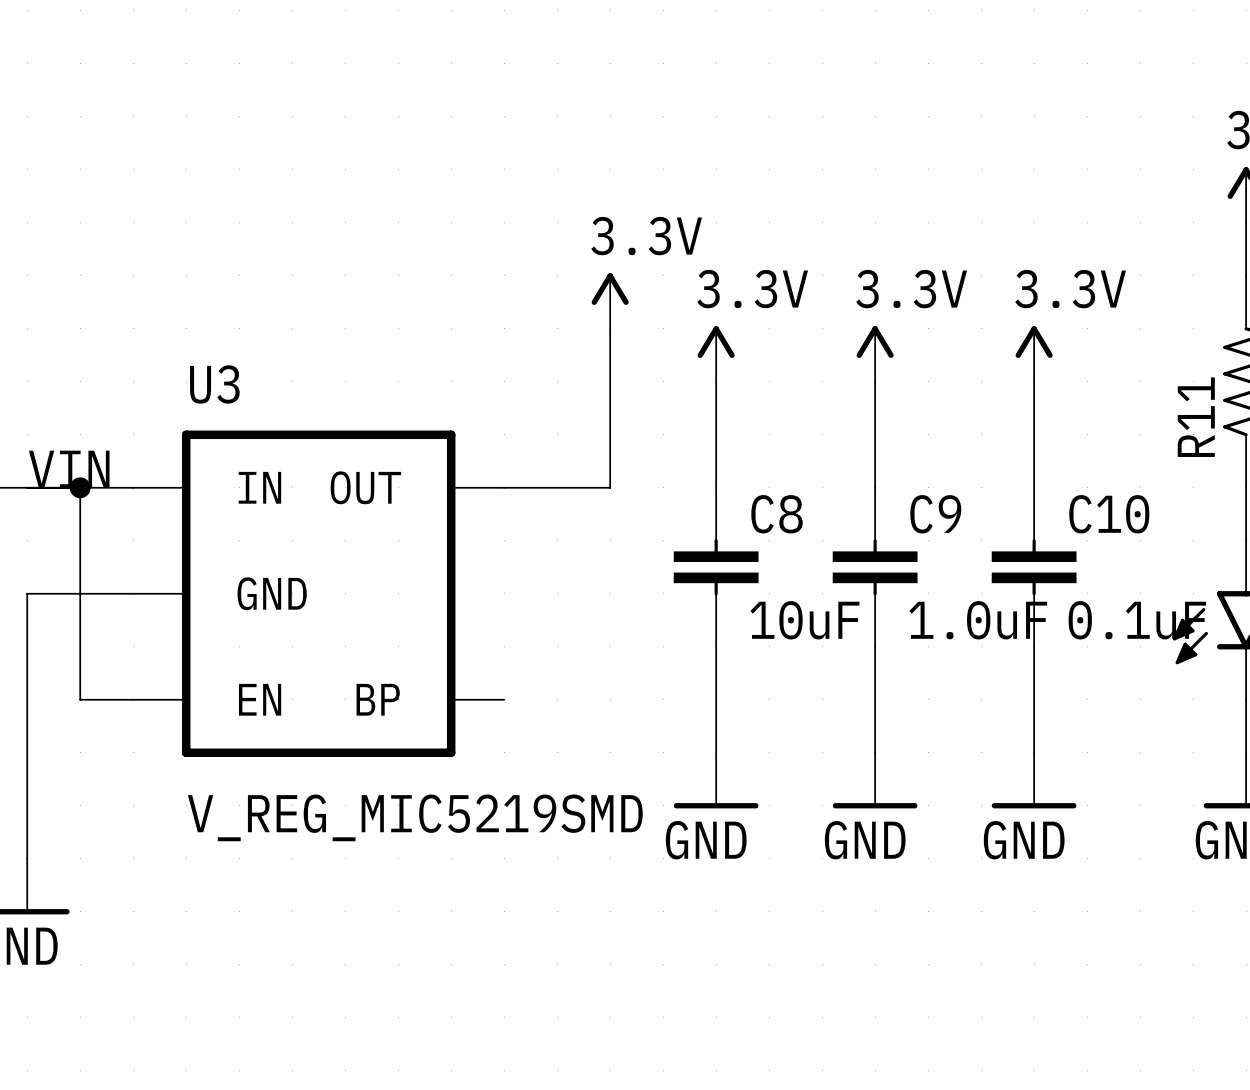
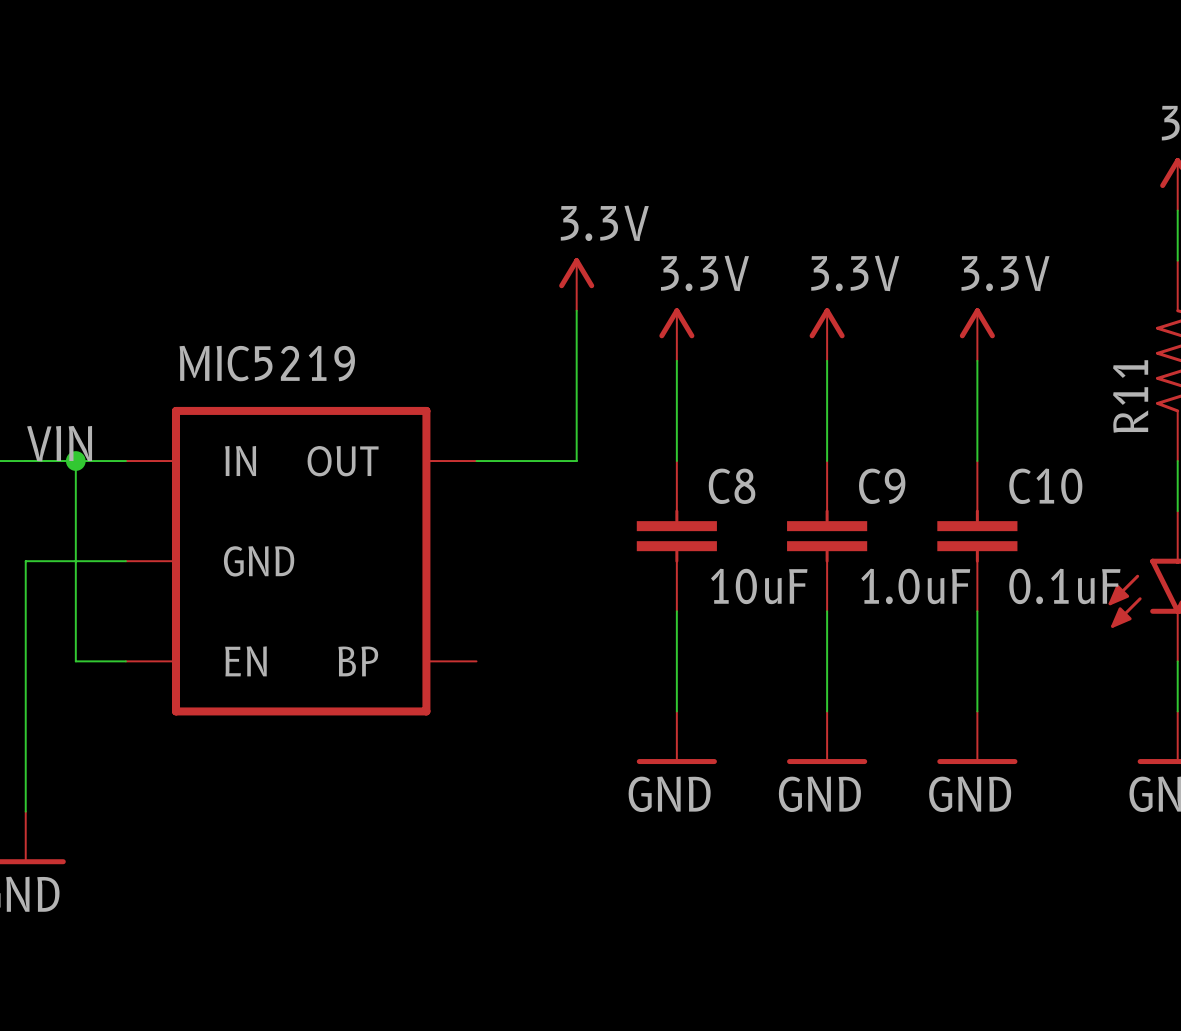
U3 name: U3 (214, 384) -> MIC5219 (267, 363)
U3 value: V_REG_MIC5219SMD (415, 817) -> none

